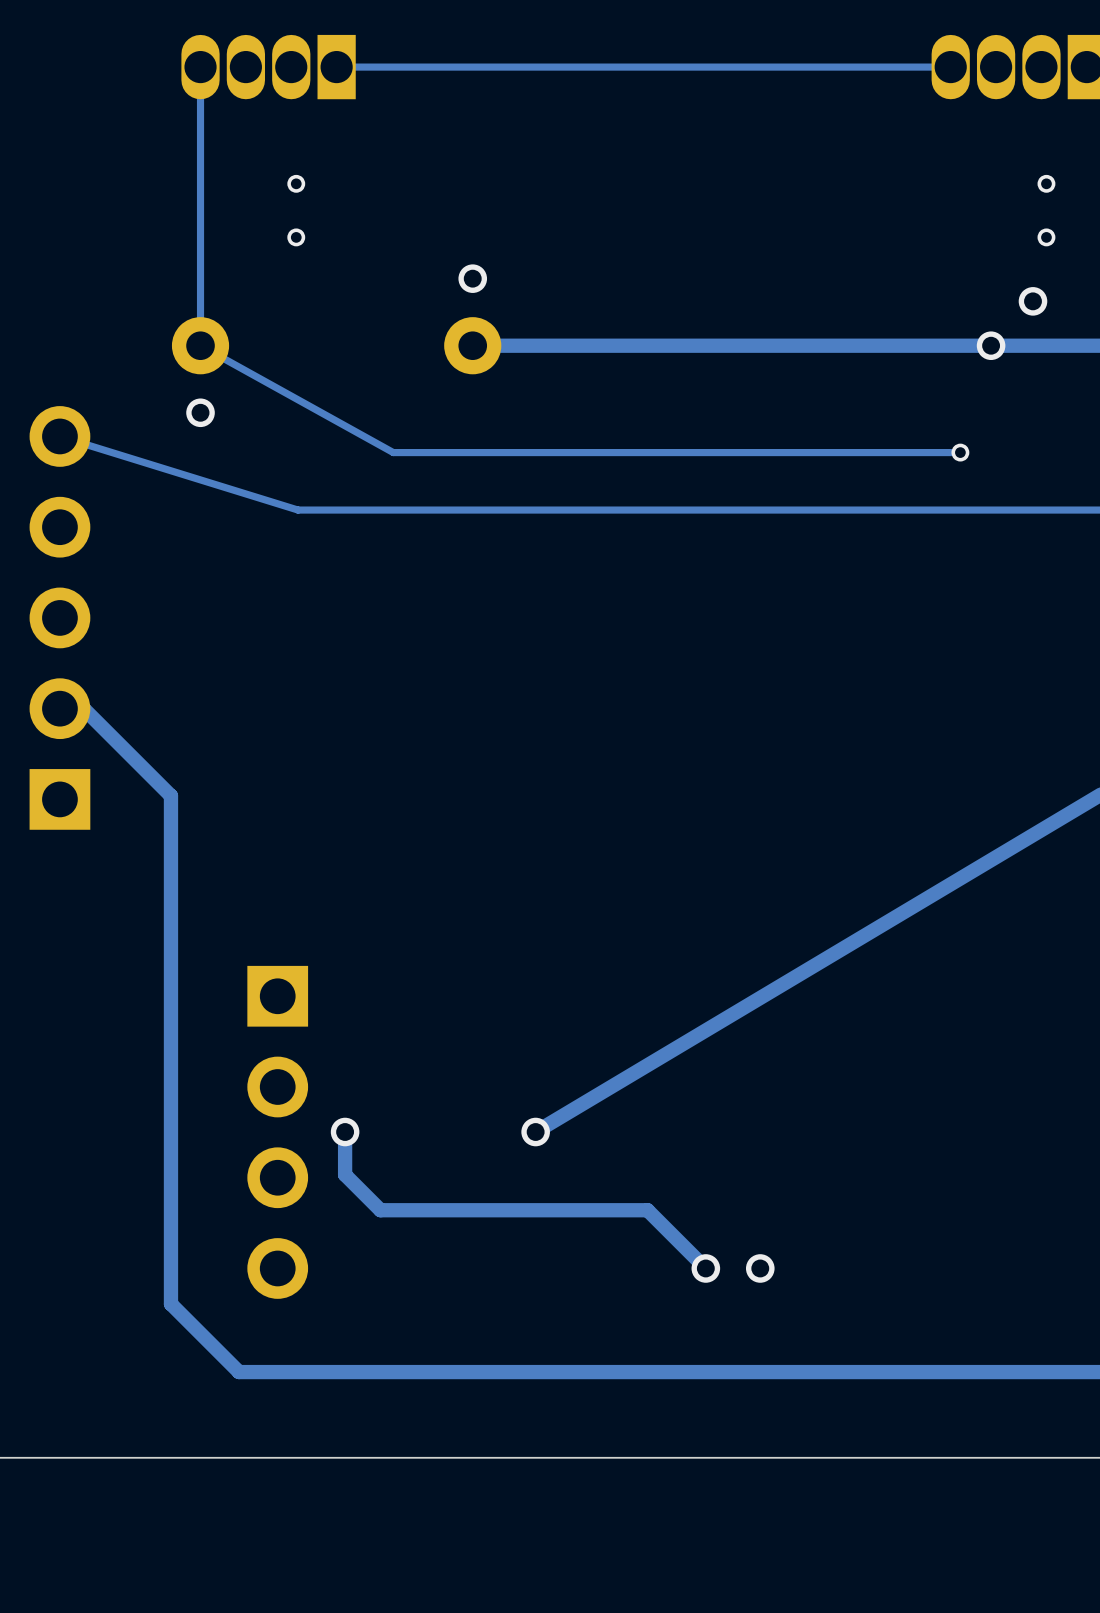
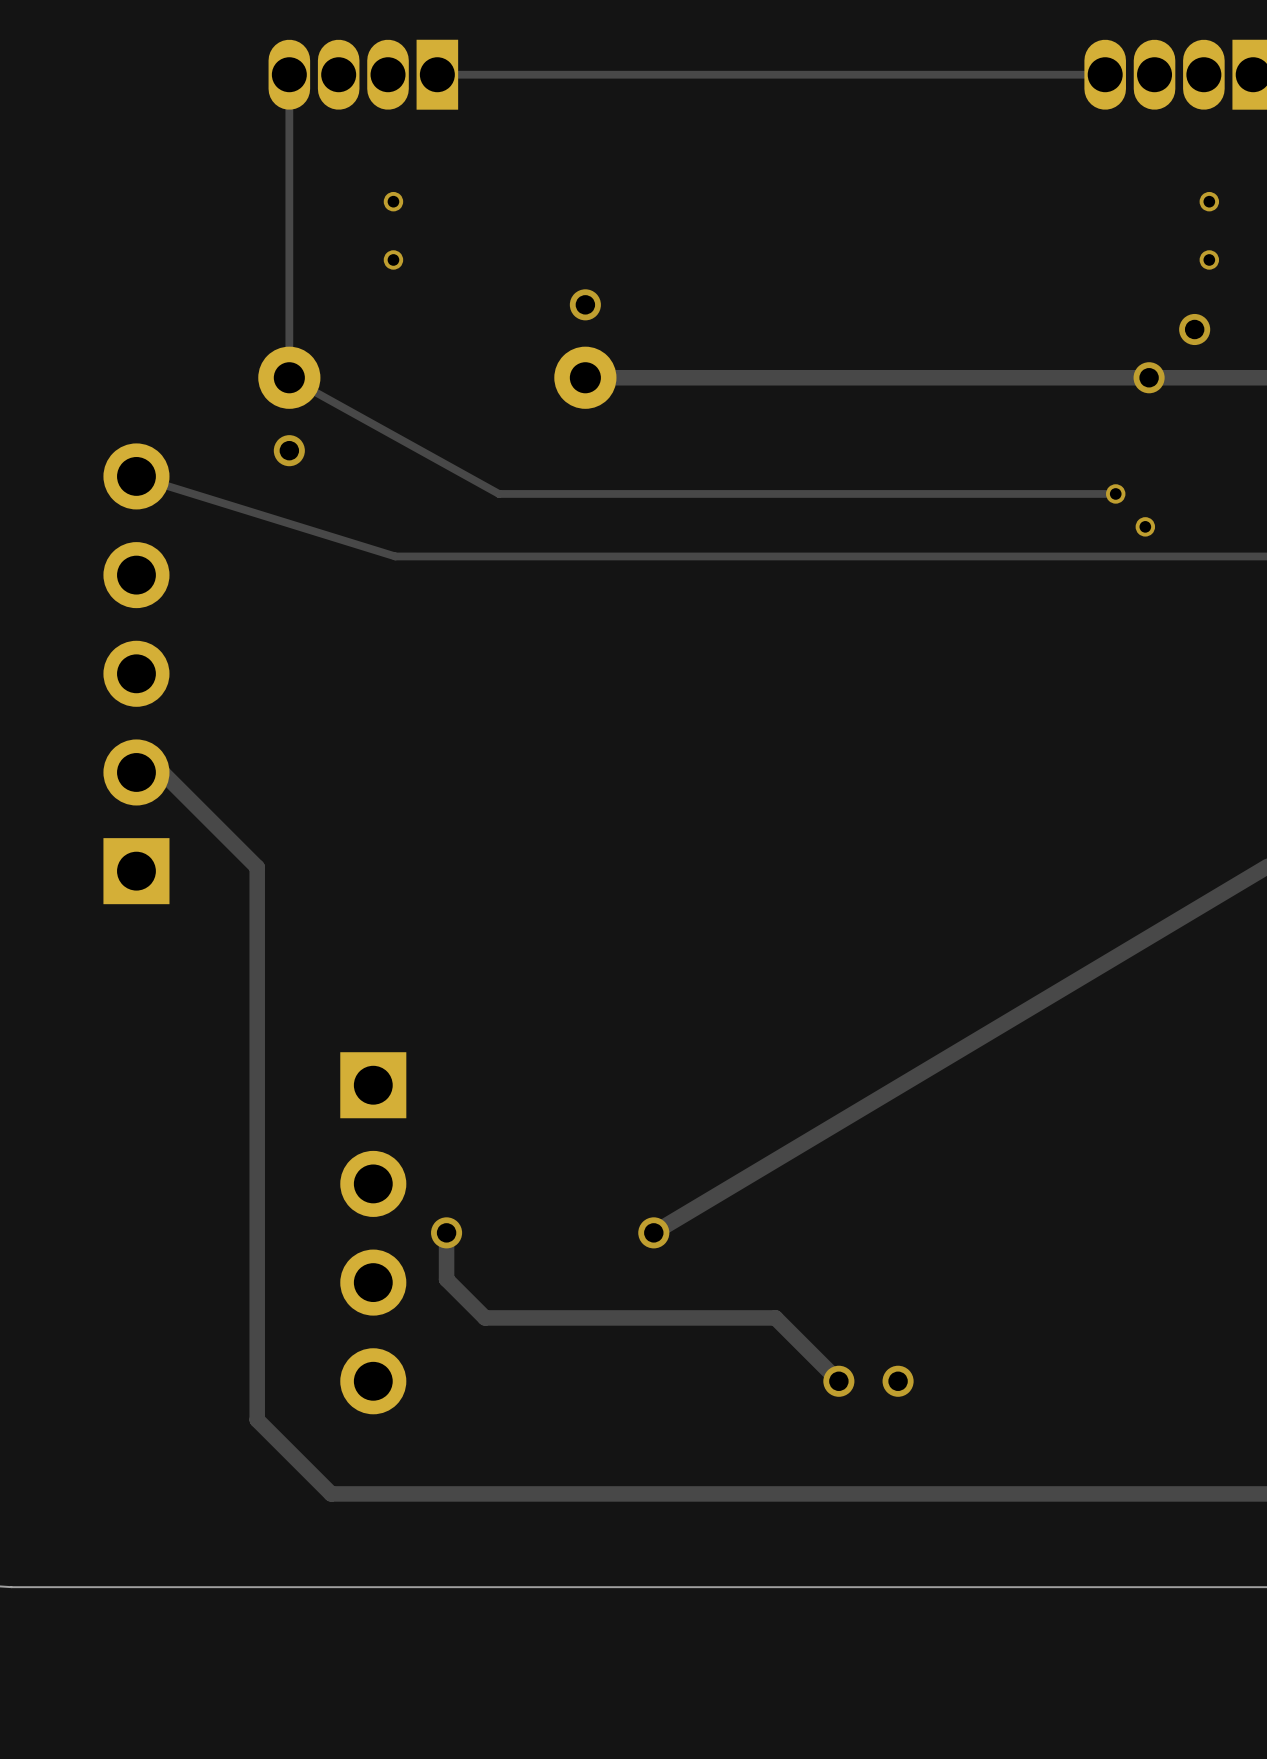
via: none -> (1145, 526)

